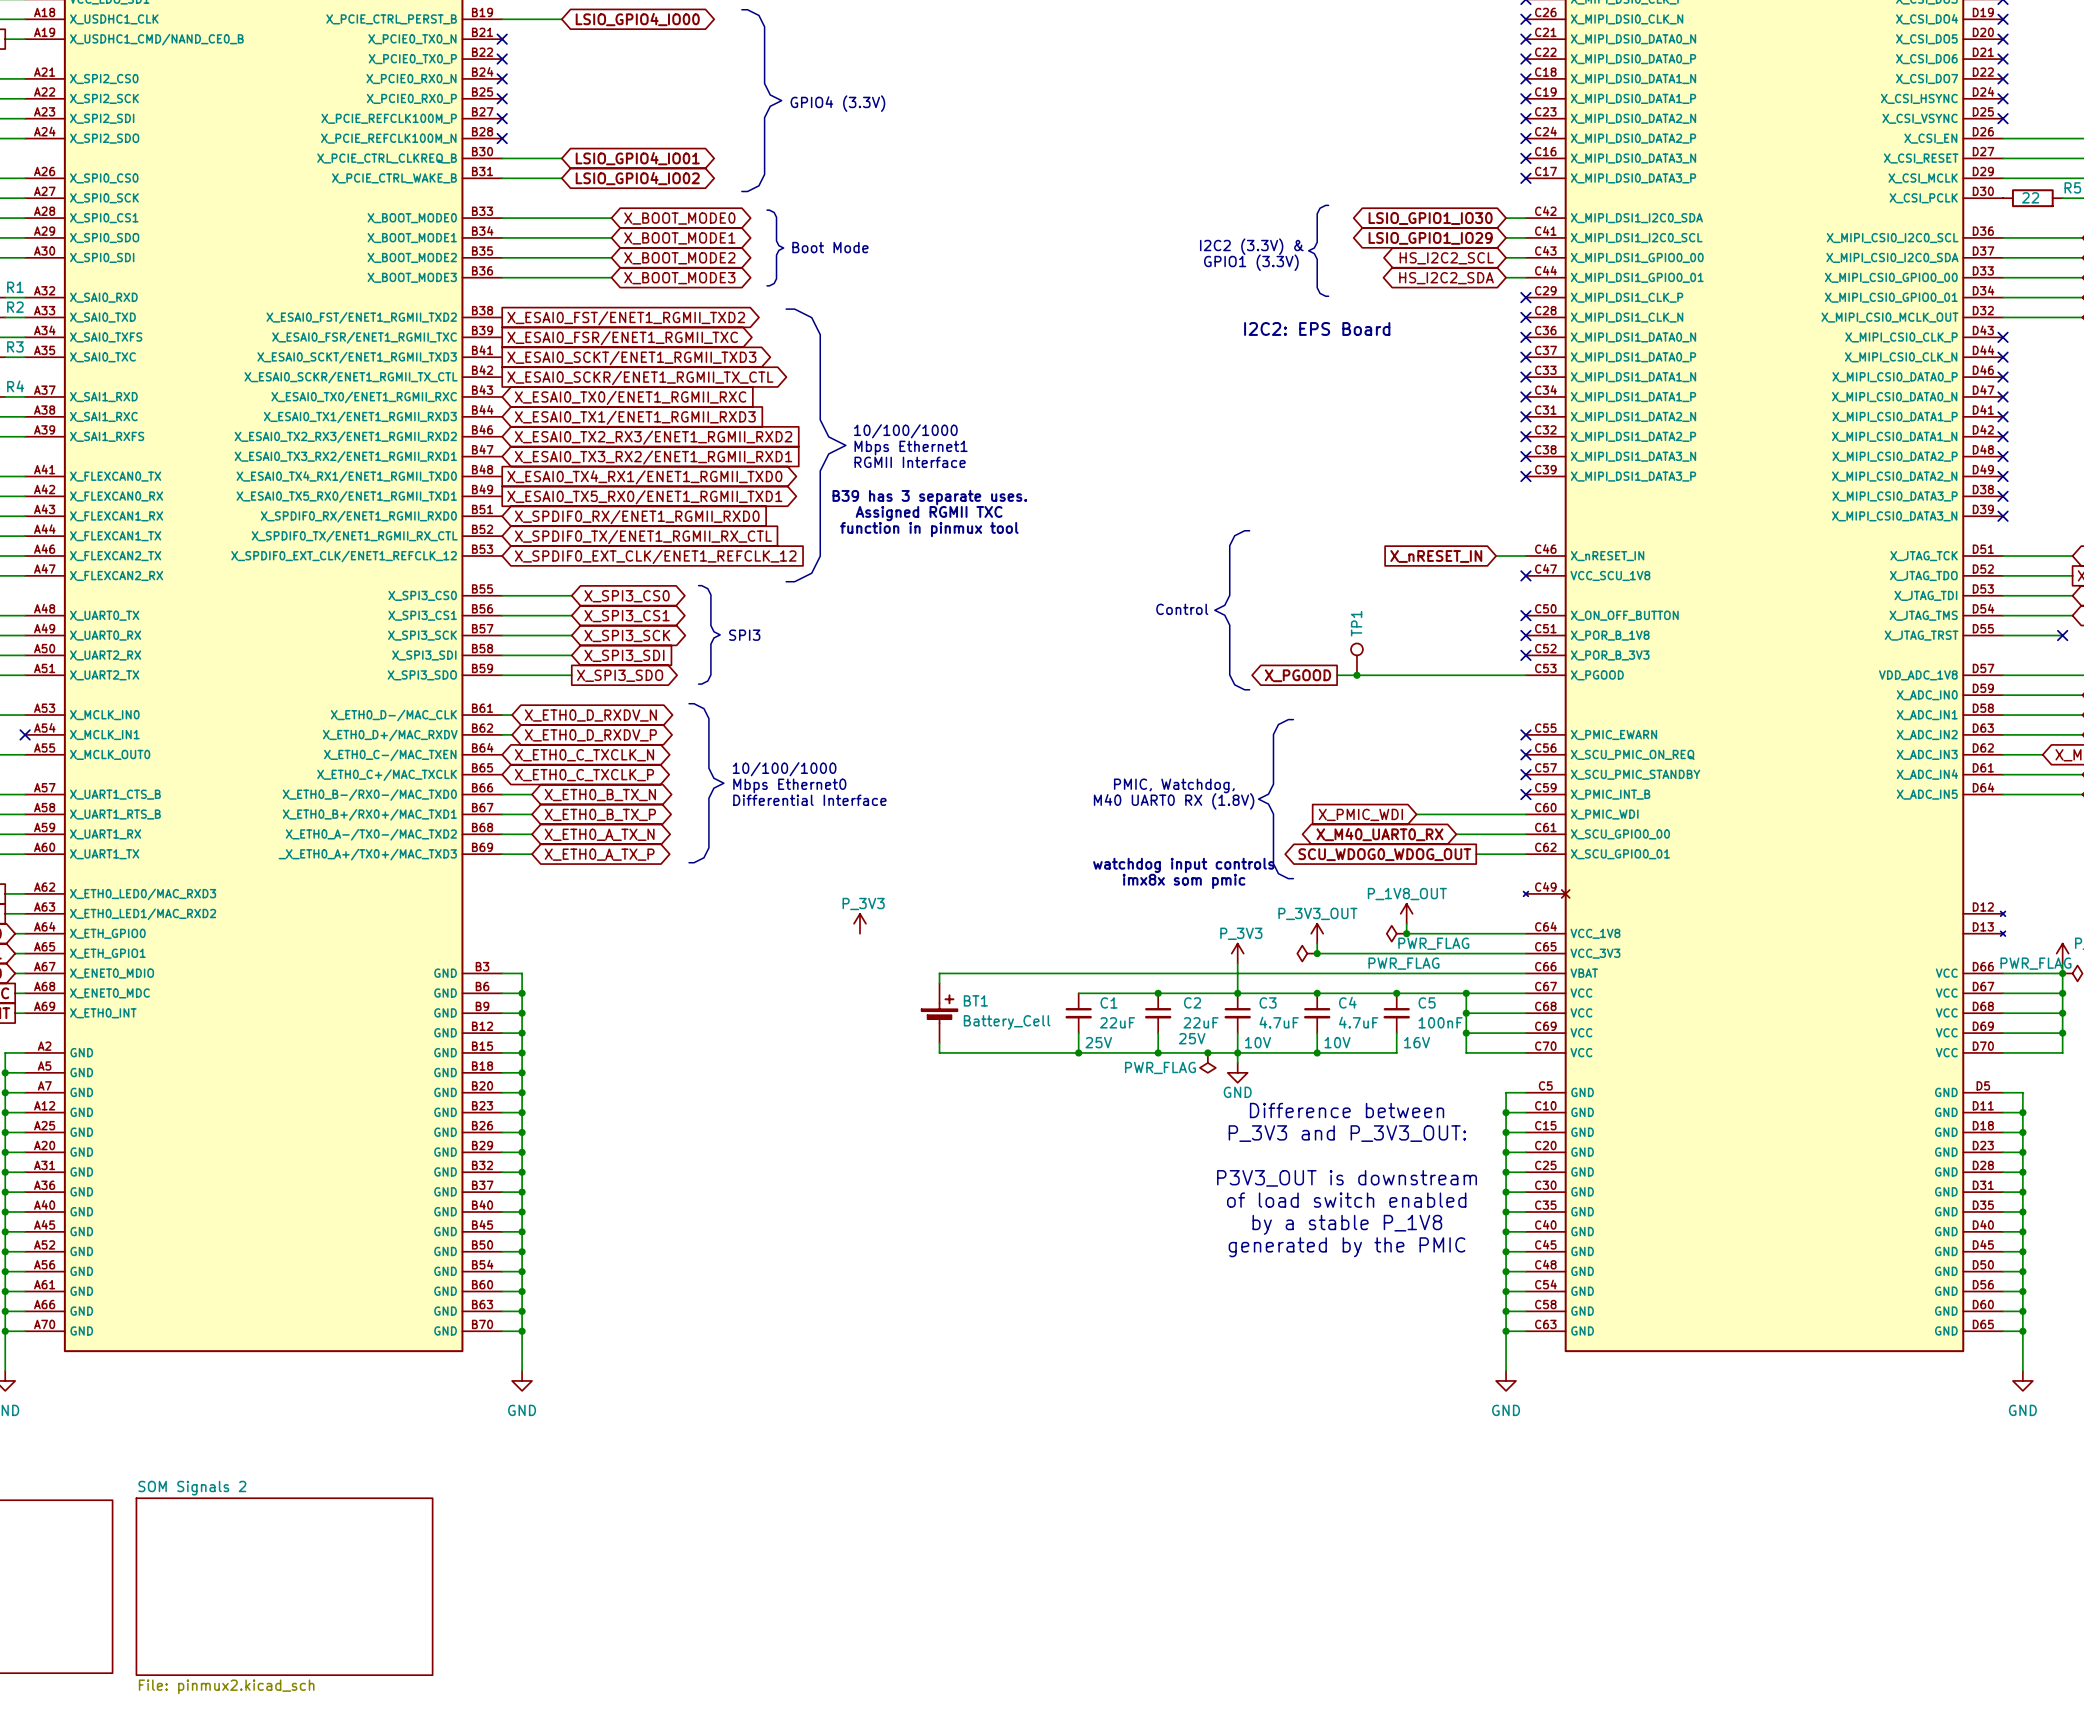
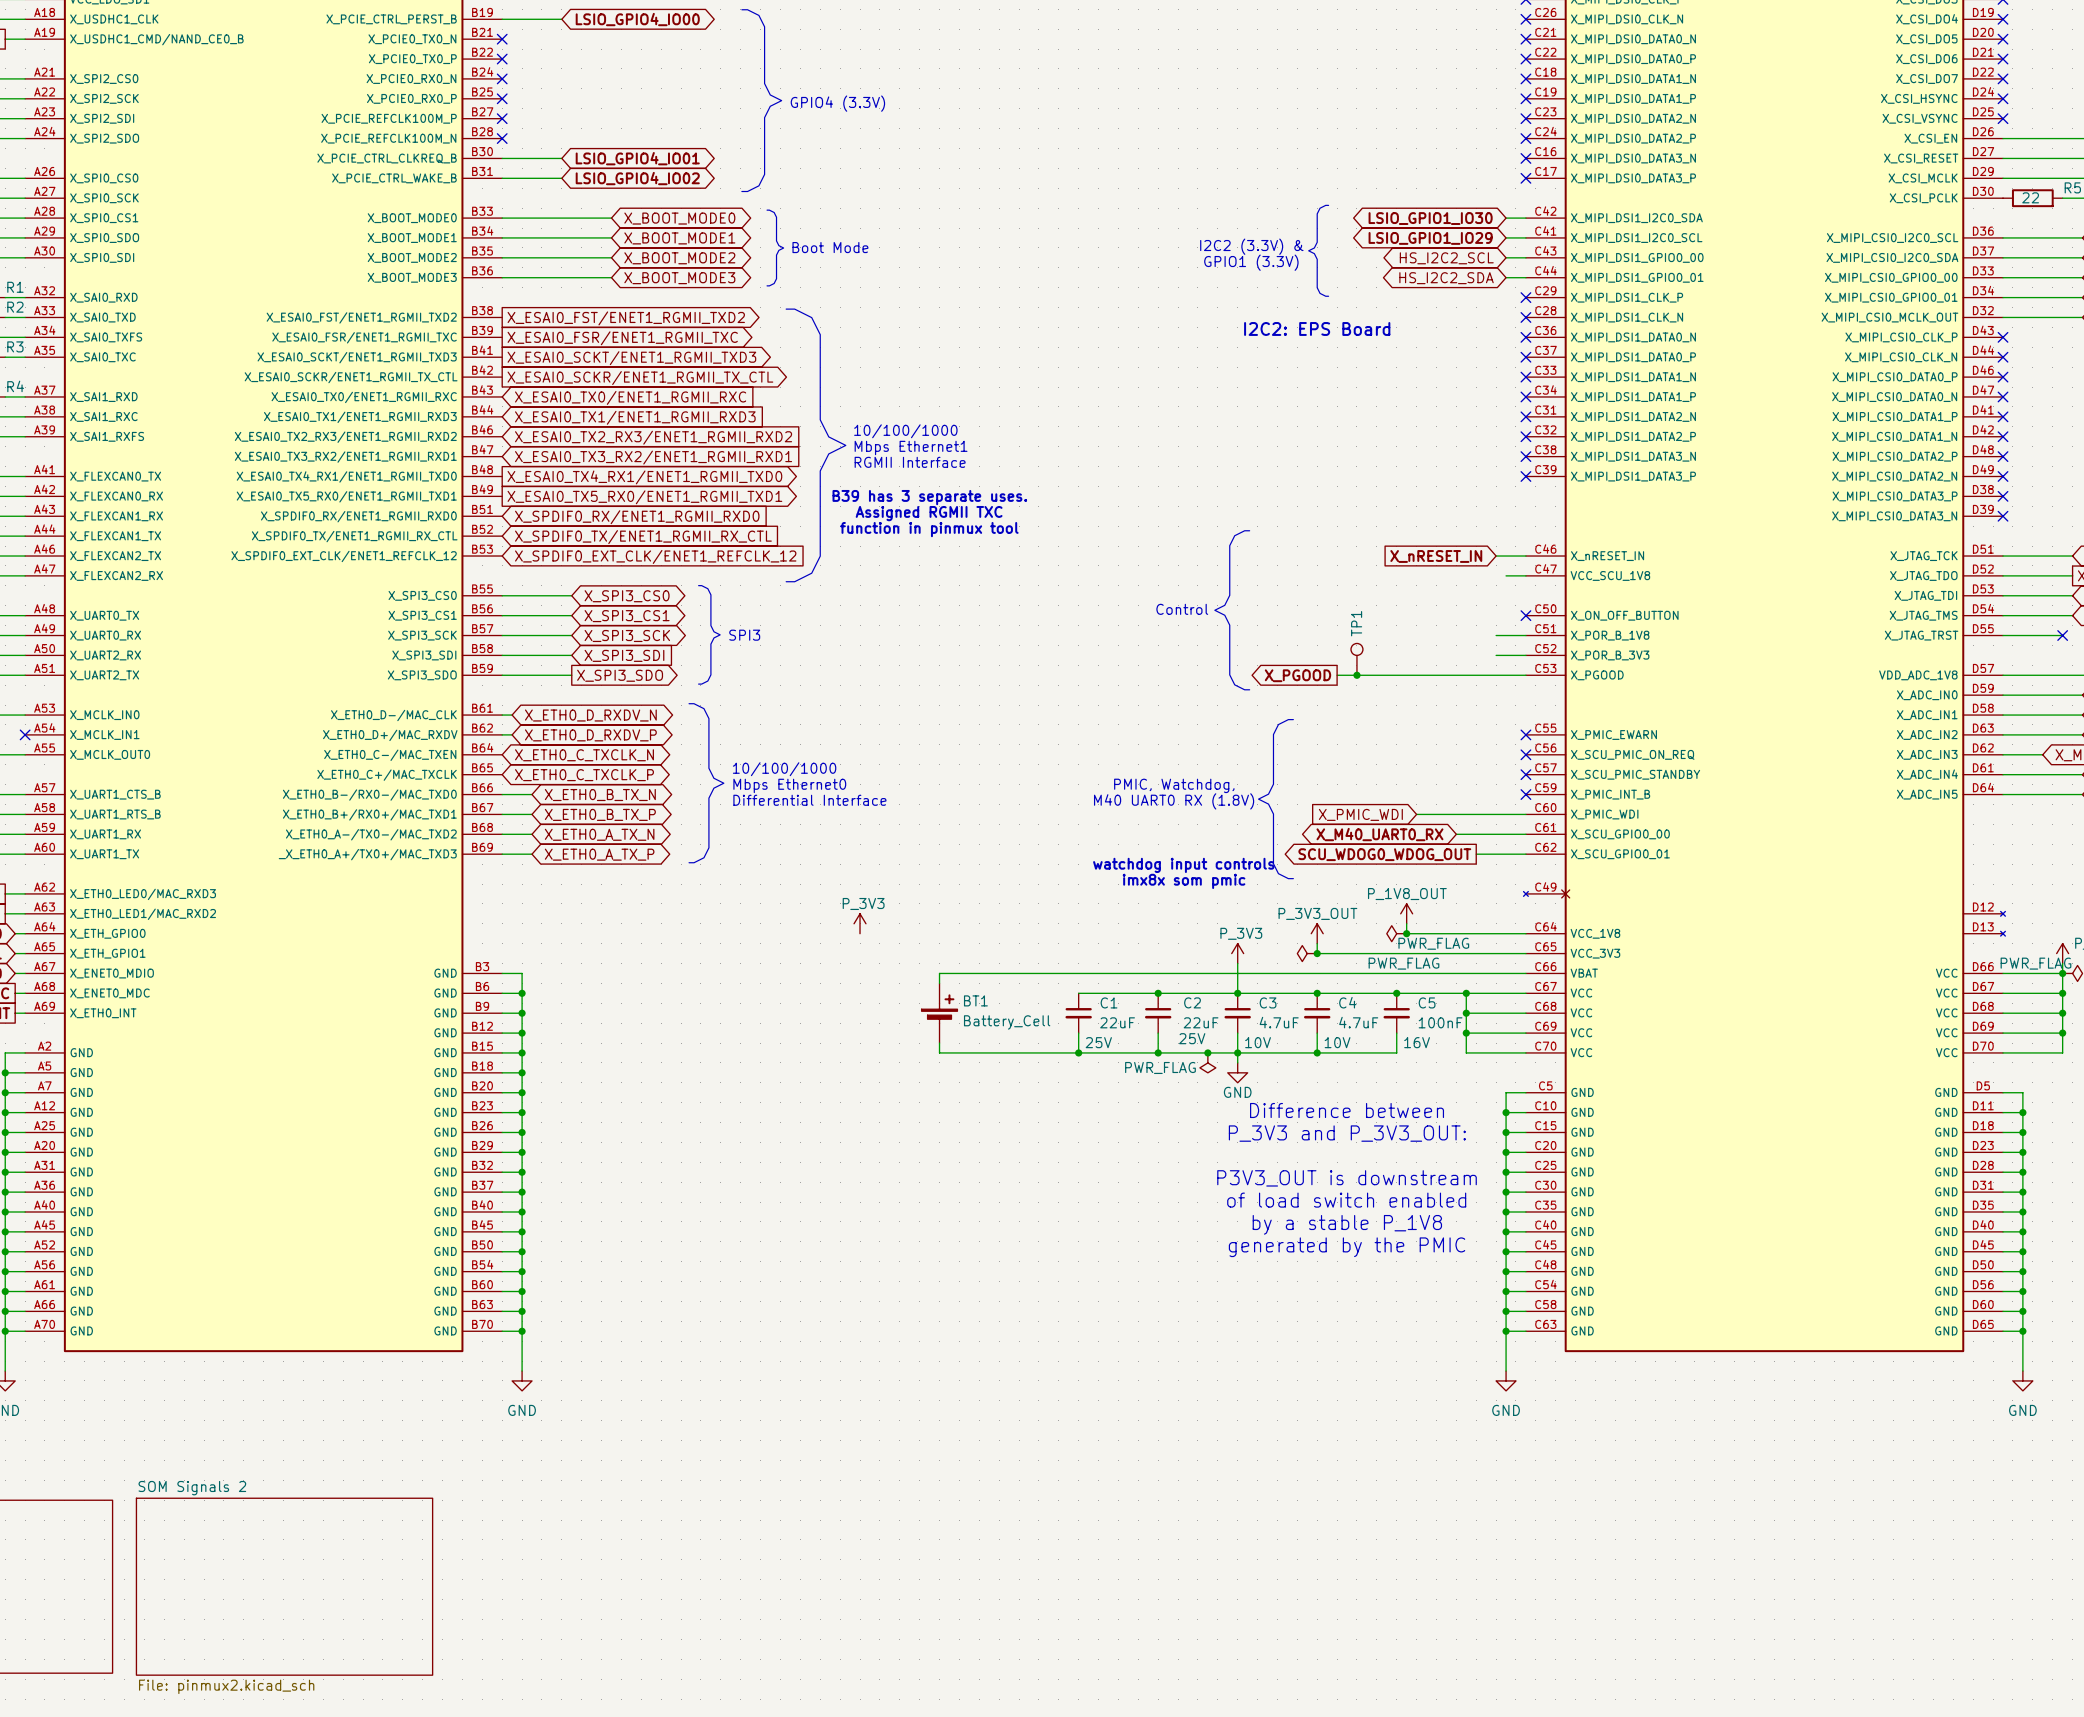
wire: none -> (1506, 575) (1525, 575)
no-connect mark: (1525, 575) -> none
wire: none -> (1496, 635) (1525, 635)
no-connect mark: (1525, 635) -> none
wire: none -> (1496, 655) (1525, 655)
no-connect mark: (1525, 655) -> none

